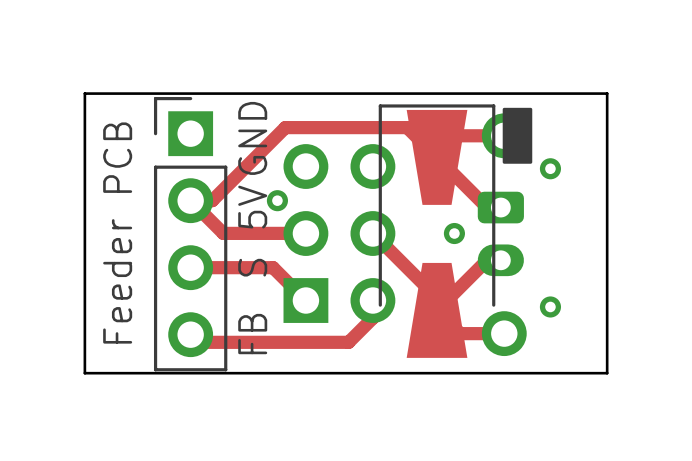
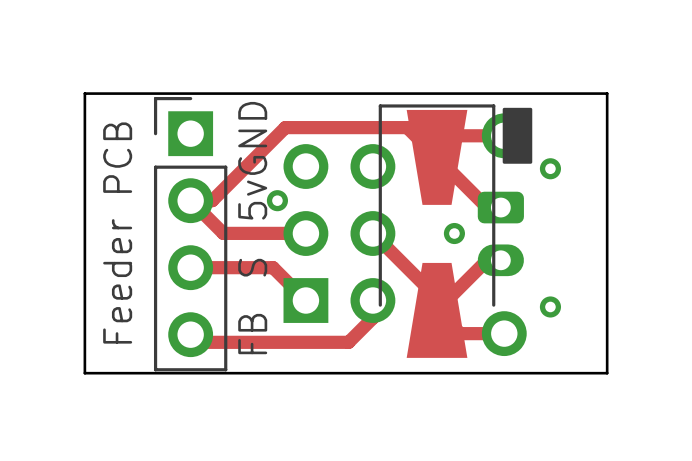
text: 5V (252, 207) -> 5v (252, 200)

